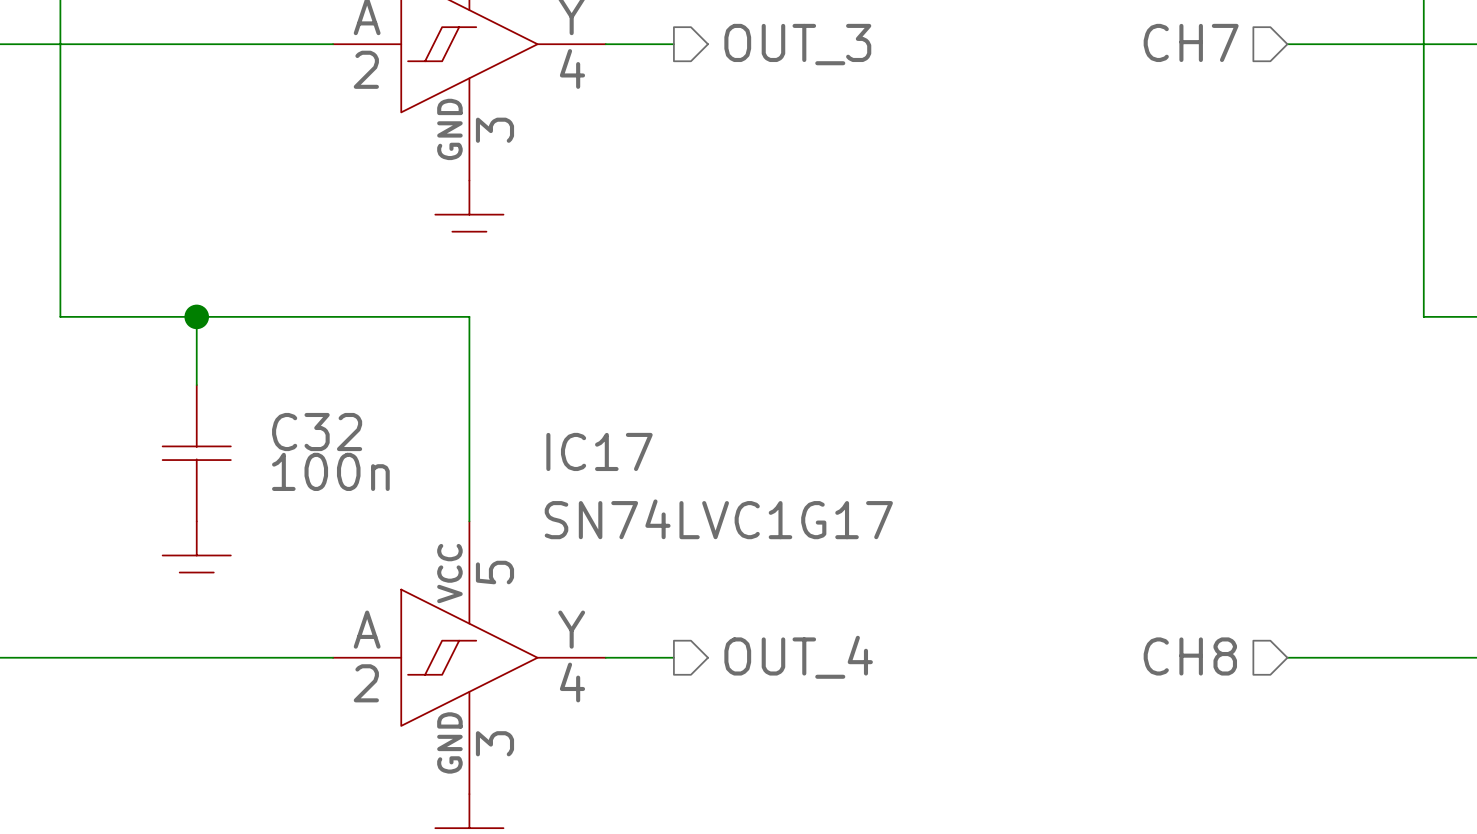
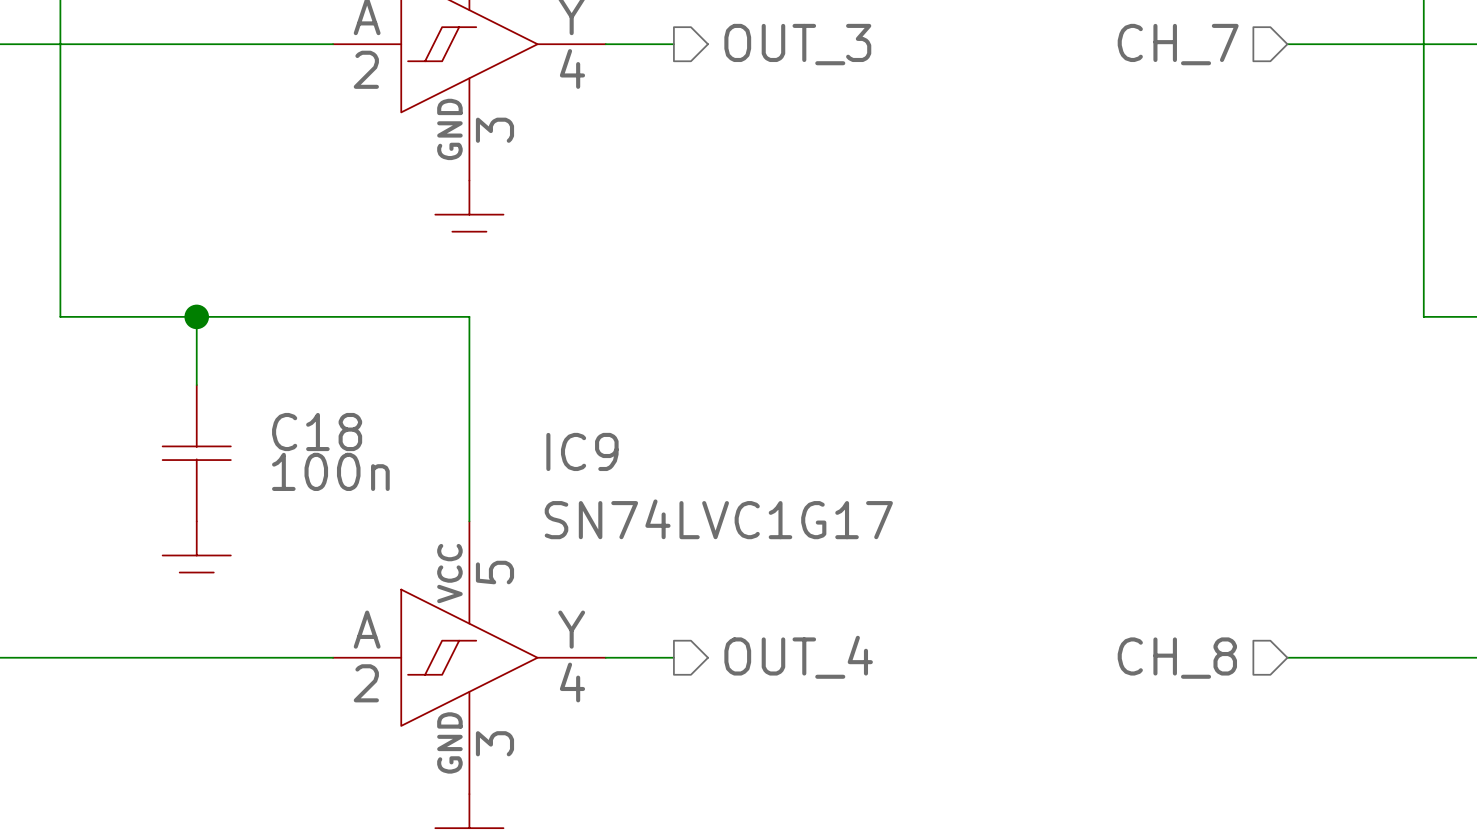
hierarchical label: CH7 (1191, 42) -> CH_7 (1178, 44)
C32 name: C32 (317, 432) -> C18 (317, 432)
IC17 name: IC17 (599, 451) -> IC9 (582, 451)
hierarchical label: CH8 (1190, 656) -> CH_8 (1177, 658)

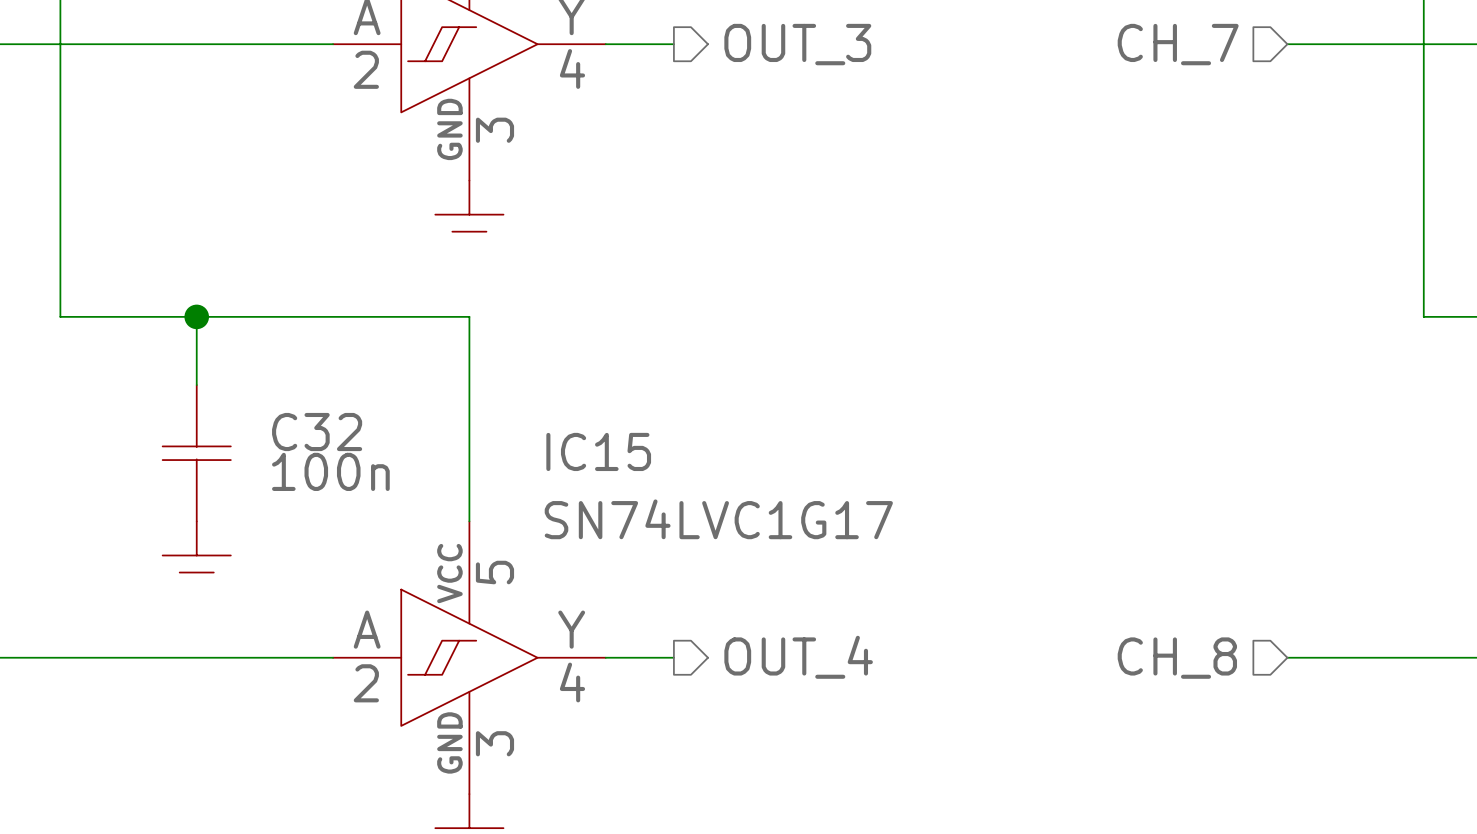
C18 name: C18 (317, 432) -> C32 (317, 432)
IC9 name: IC9 (582, 451) -> IC15 (598, 451)

